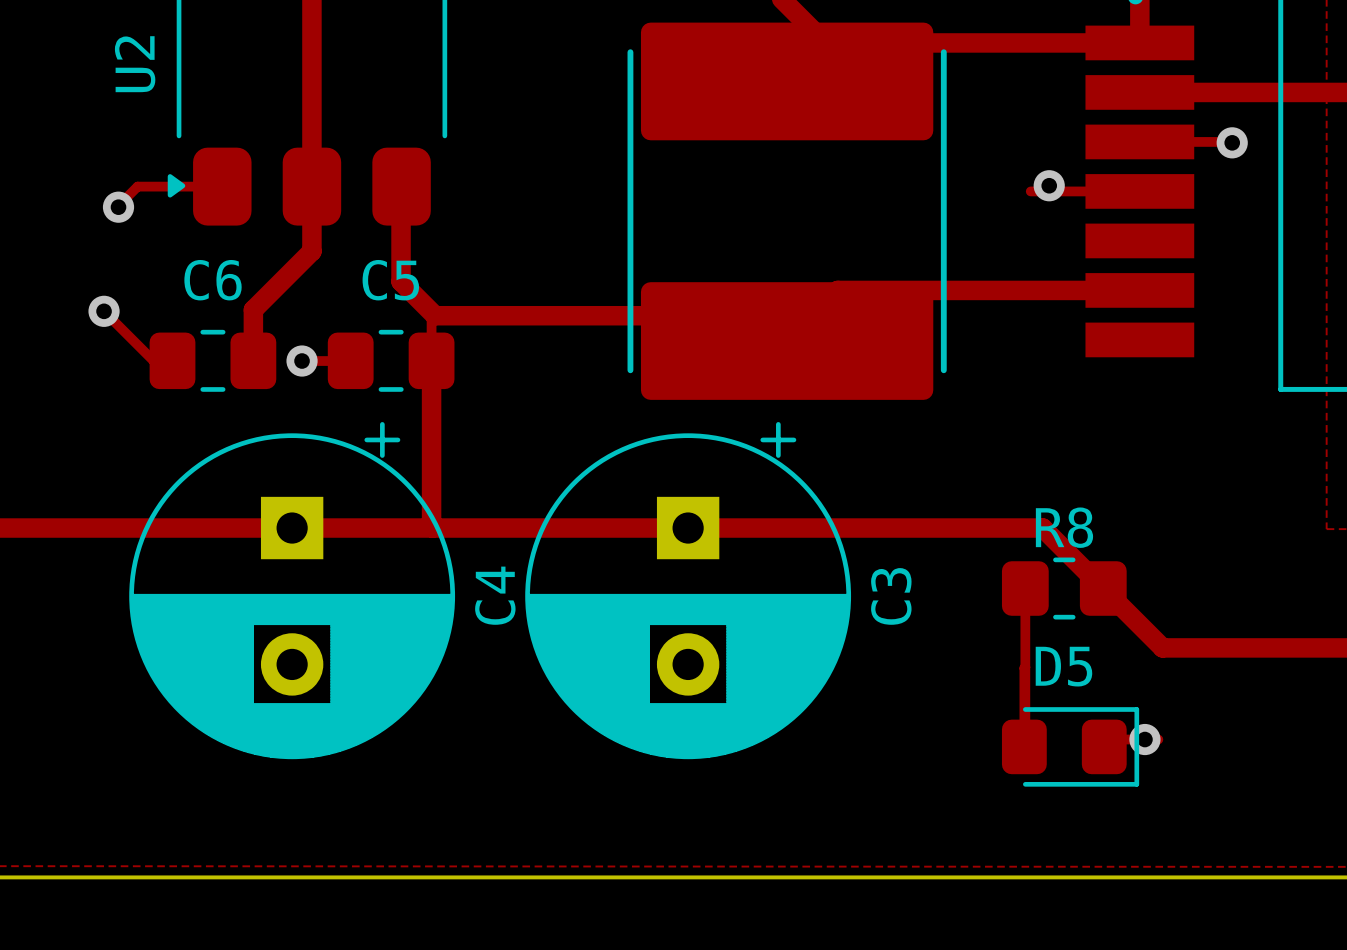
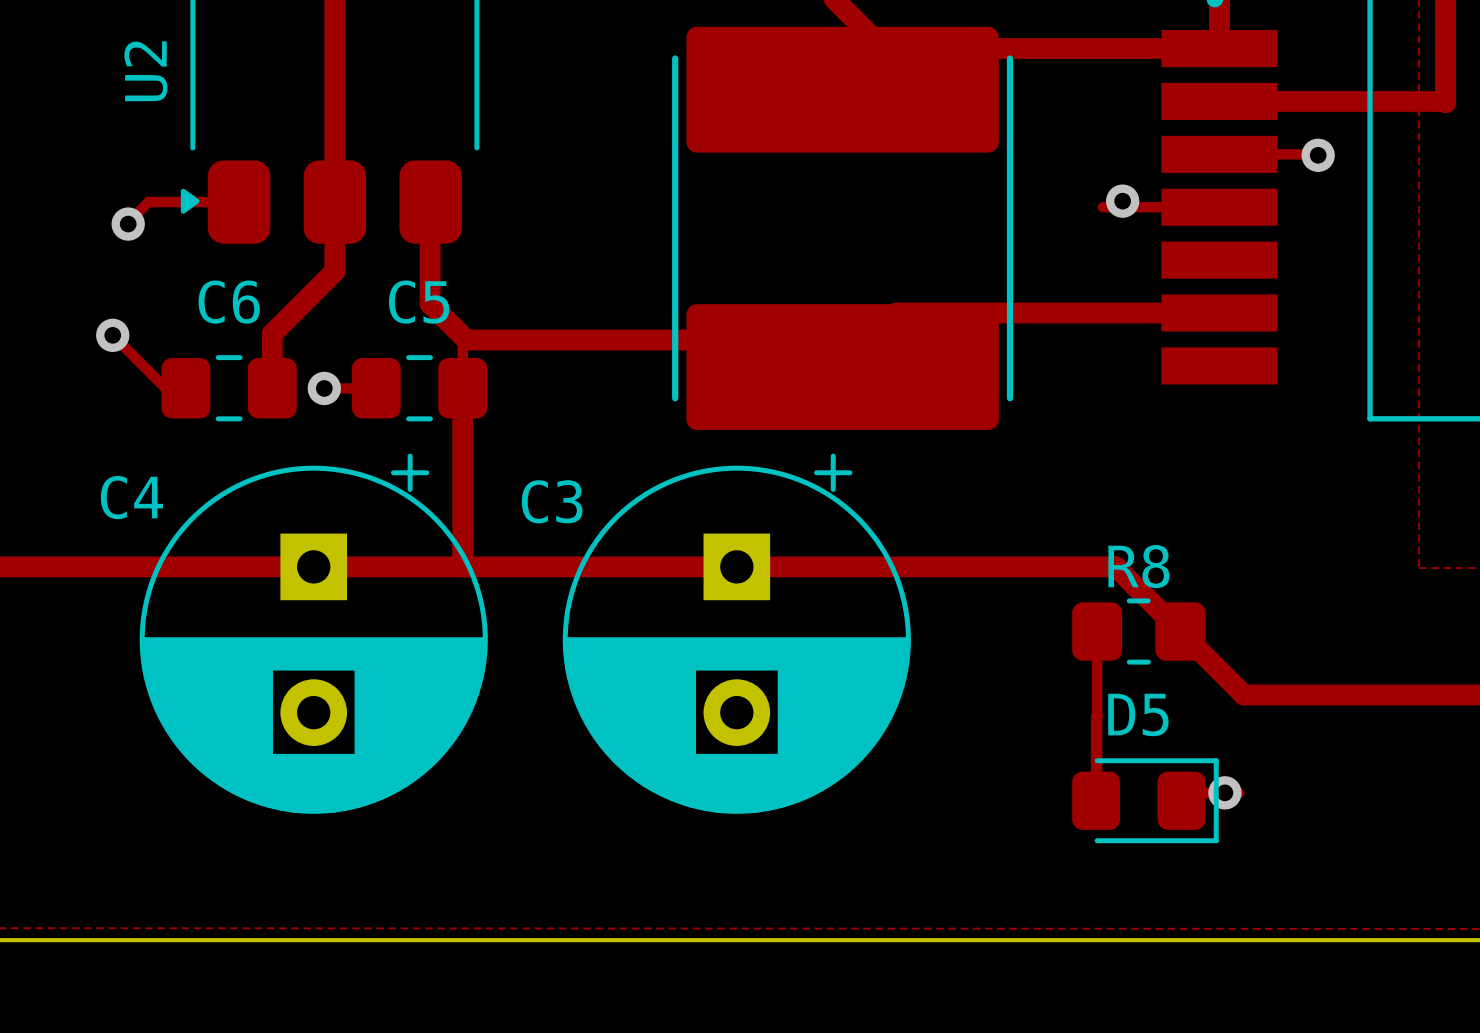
C4 name rotation: 0° (495, 595) -> 90° clockwise (131, 497)
C4 name position: C4 (495, 595) -> C4 (131, 497)
C3 name rotation: 0° (891, 596) -> 90° clockwise (552, 501)
C3 name position: C3 (891, 596) -> C3 (552, 501)

